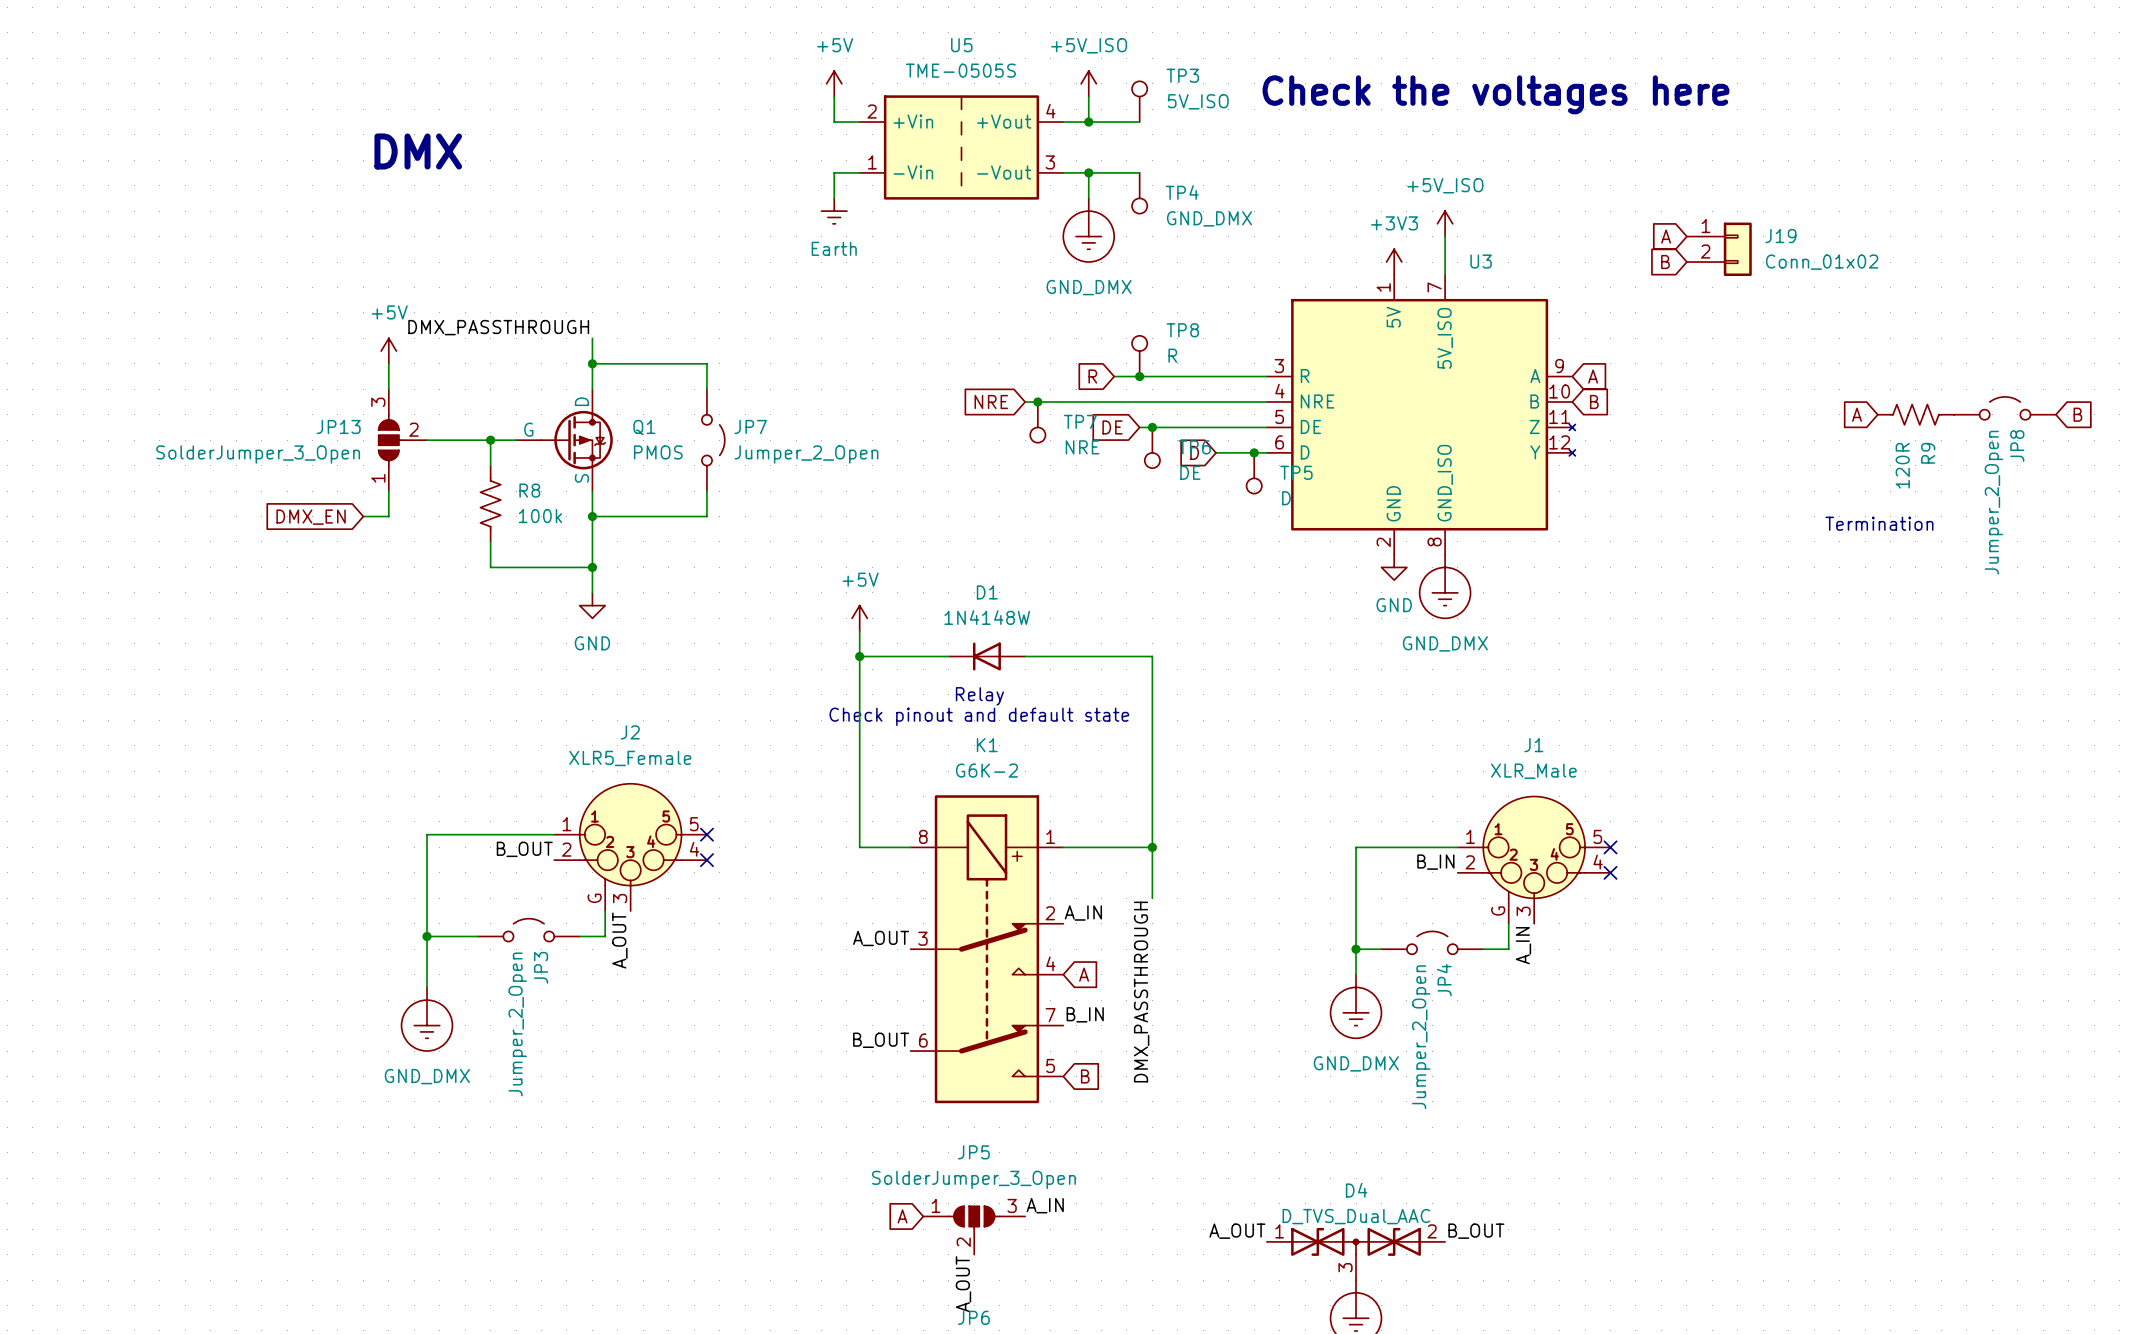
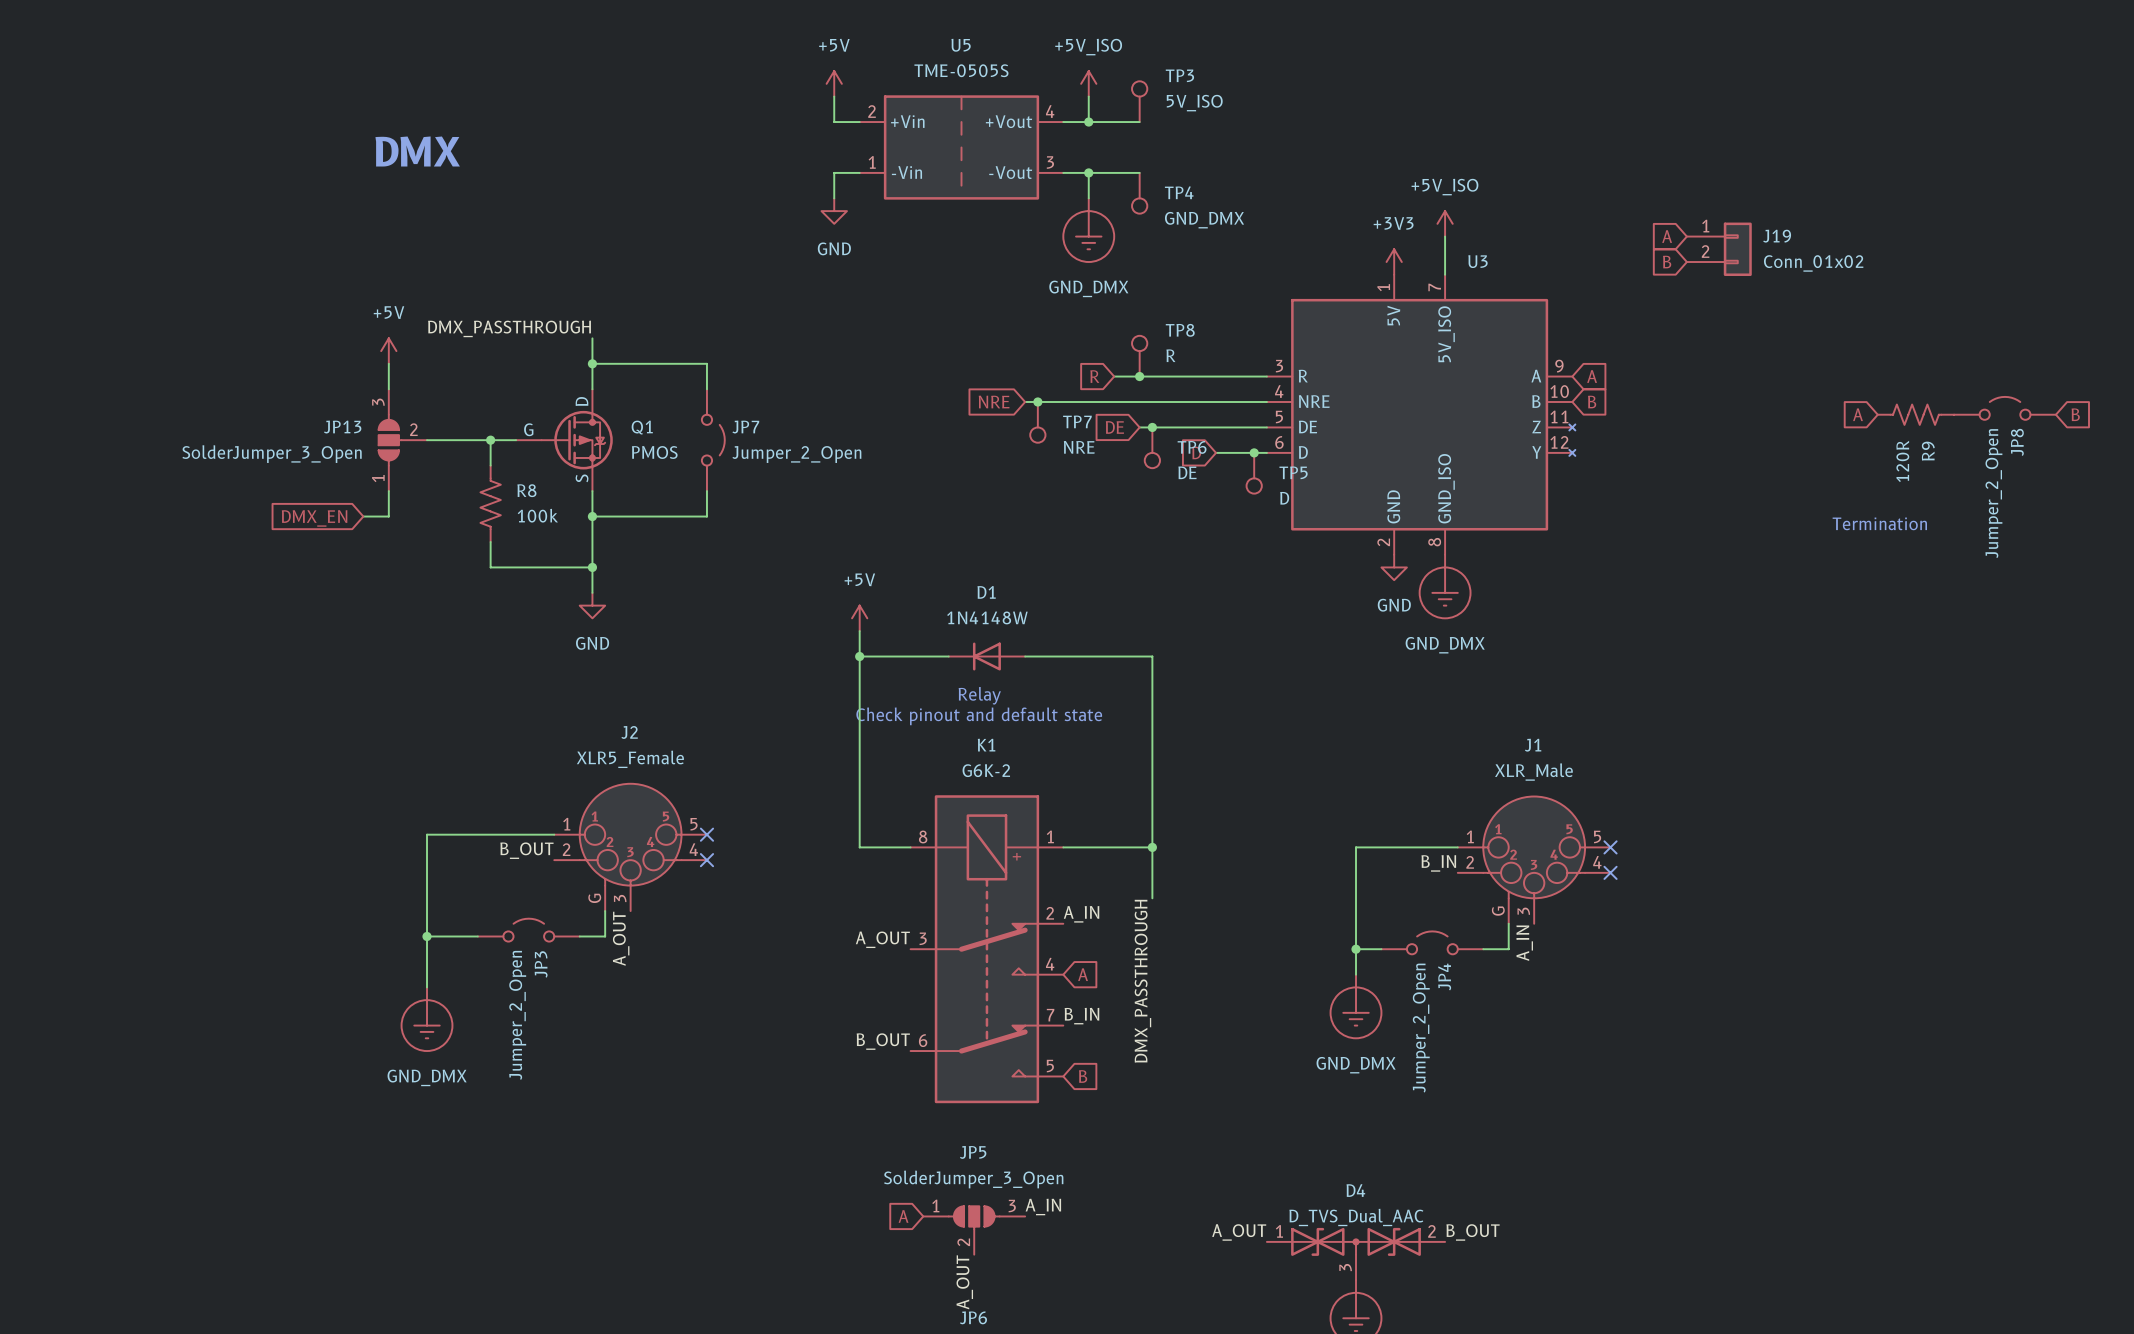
text: Check the voltages here (1495, 94) -> none
power symbol: Earth (834, 211) -> GND (834, 211)

